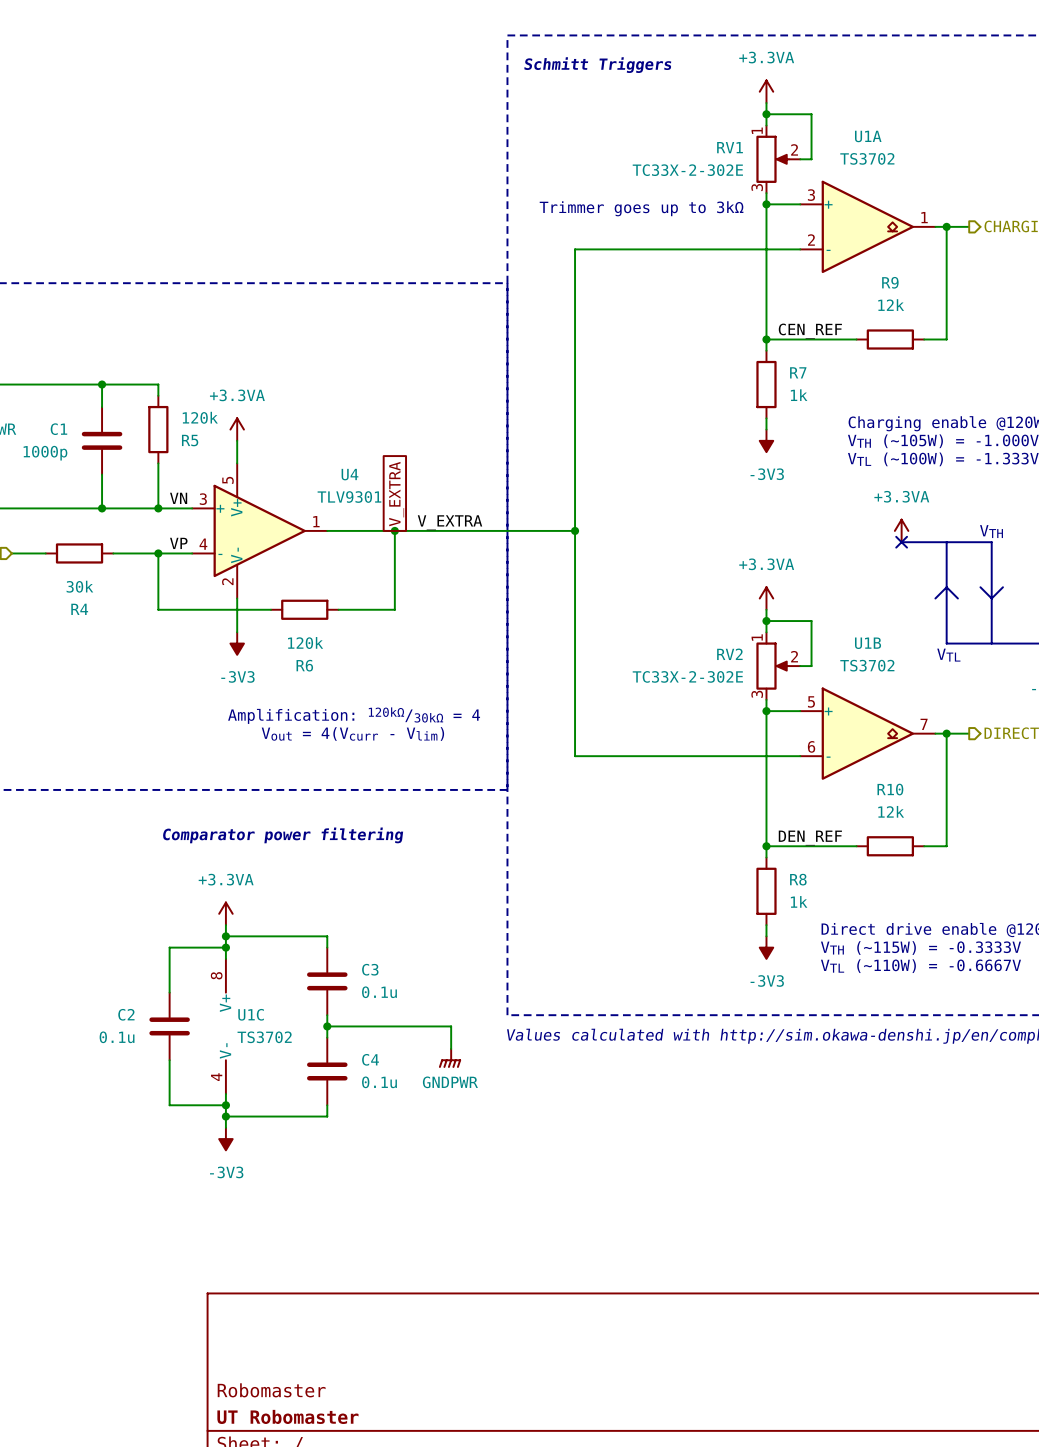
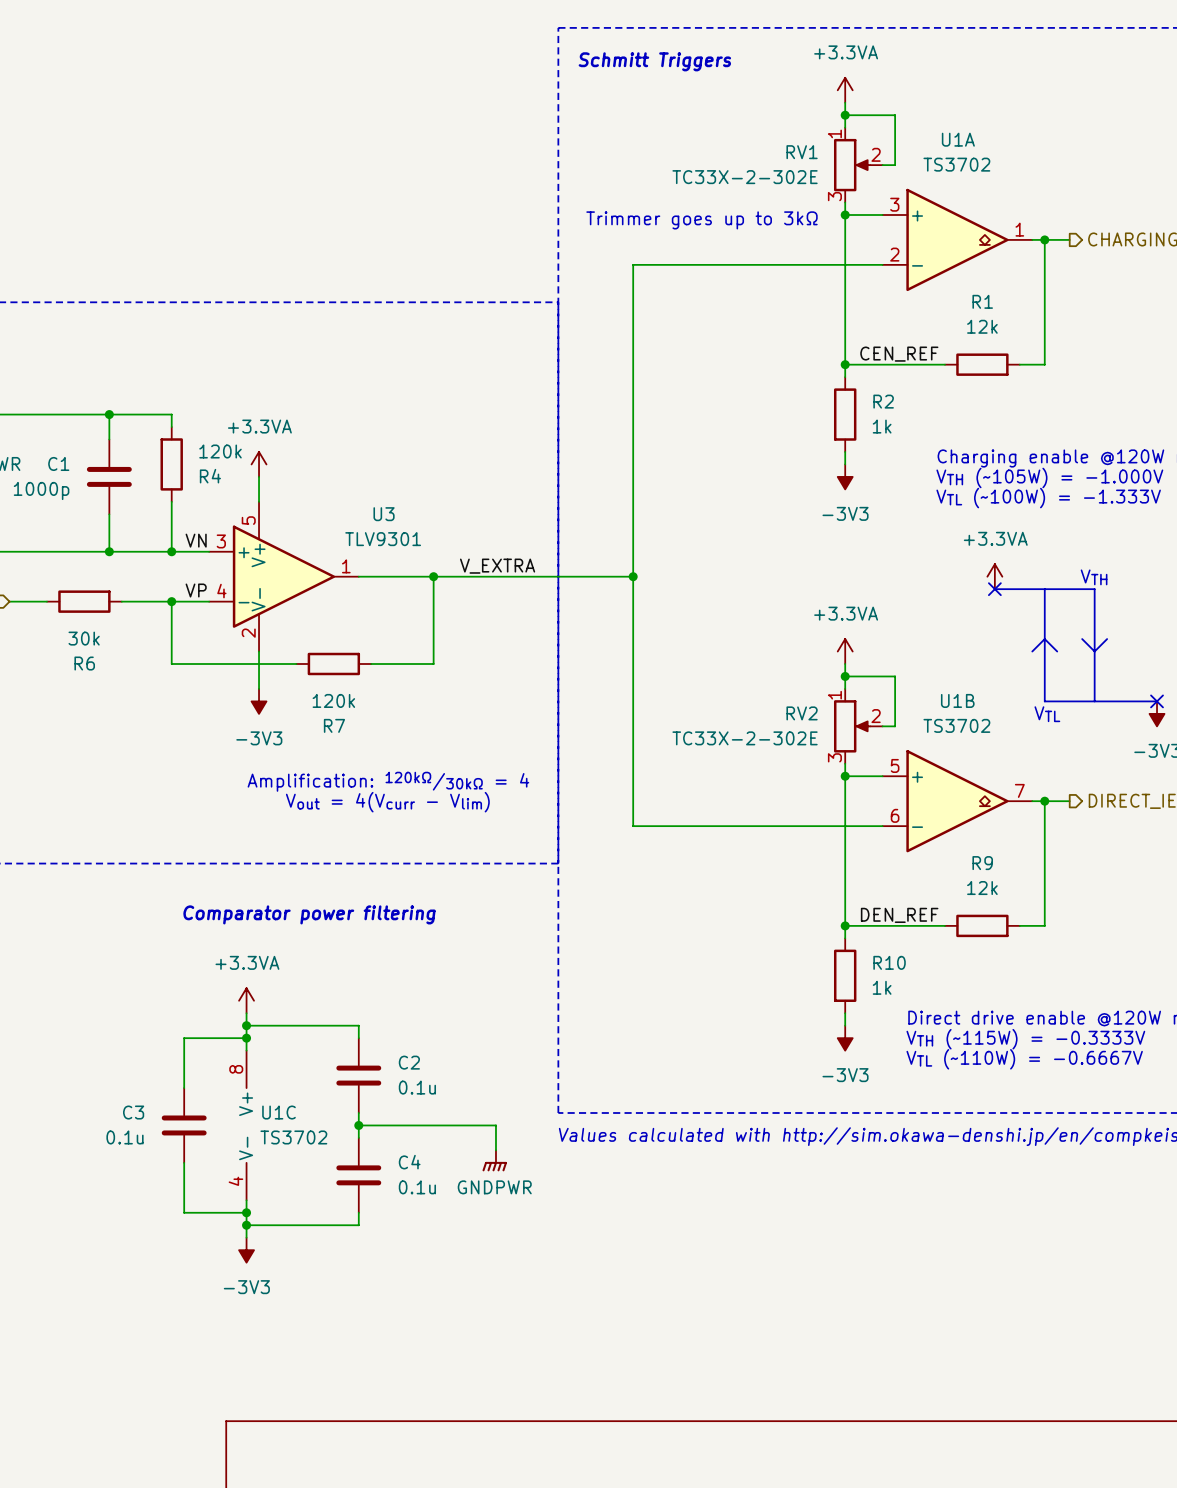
R9 name: R9 (890, 282) -> R1 (982, 301)
R7 name: R7 (798, 372) -> R2 (883, 401)
R5 name: R5 (190, 440) -> R4 (210, 476)
U4 name: U4 (349, 474) -> U3 (384, 514)
global label: V_EXTRA (396, 494) -> none
R4 name: R4 (79, 609) -> R6 (84, 663)
R6 name: R6 (304, 665) -> R7 (334, 725)
R10 name: R10 (890, 789) -> R9 (982, 863)
R8 name: R8 (798, 879) -> R10 (889, 962)
C3 name: C3 (370, 969) -> C2 (409, 1062)
C2 name: C2 (126, 1014) -> C3 (133, 1112)

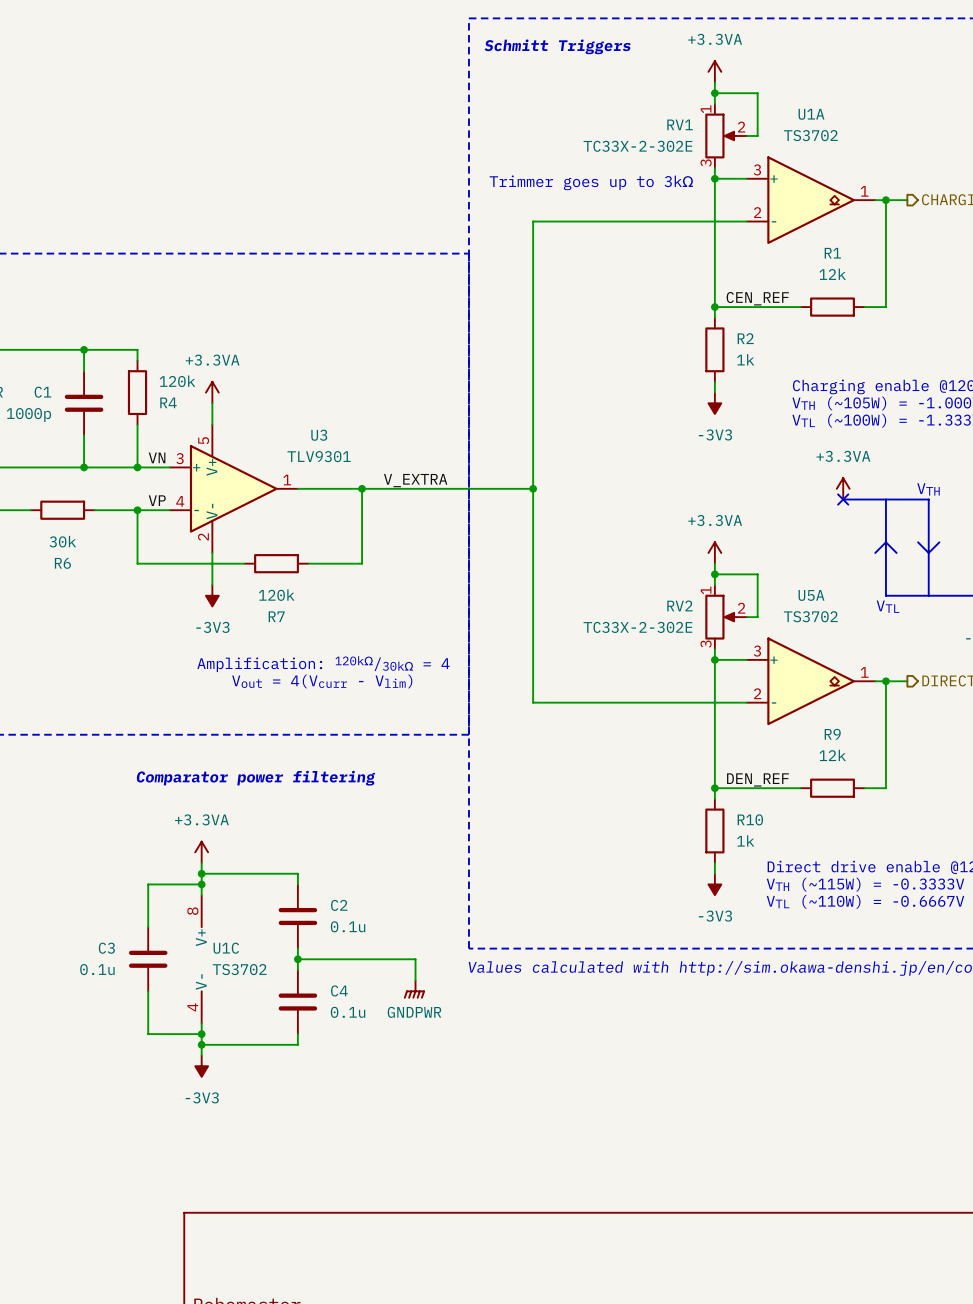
U1B name: U1B (957, 700) -> U5A (811, 595)
U1B pin number: 5 (895, 765) -> 3 (757, 651)
U1B pin number: 7 (1019, 790) -> 1 (864, 672)
U1B pin number: 6 (895, 815) -> 2 (757, 693)

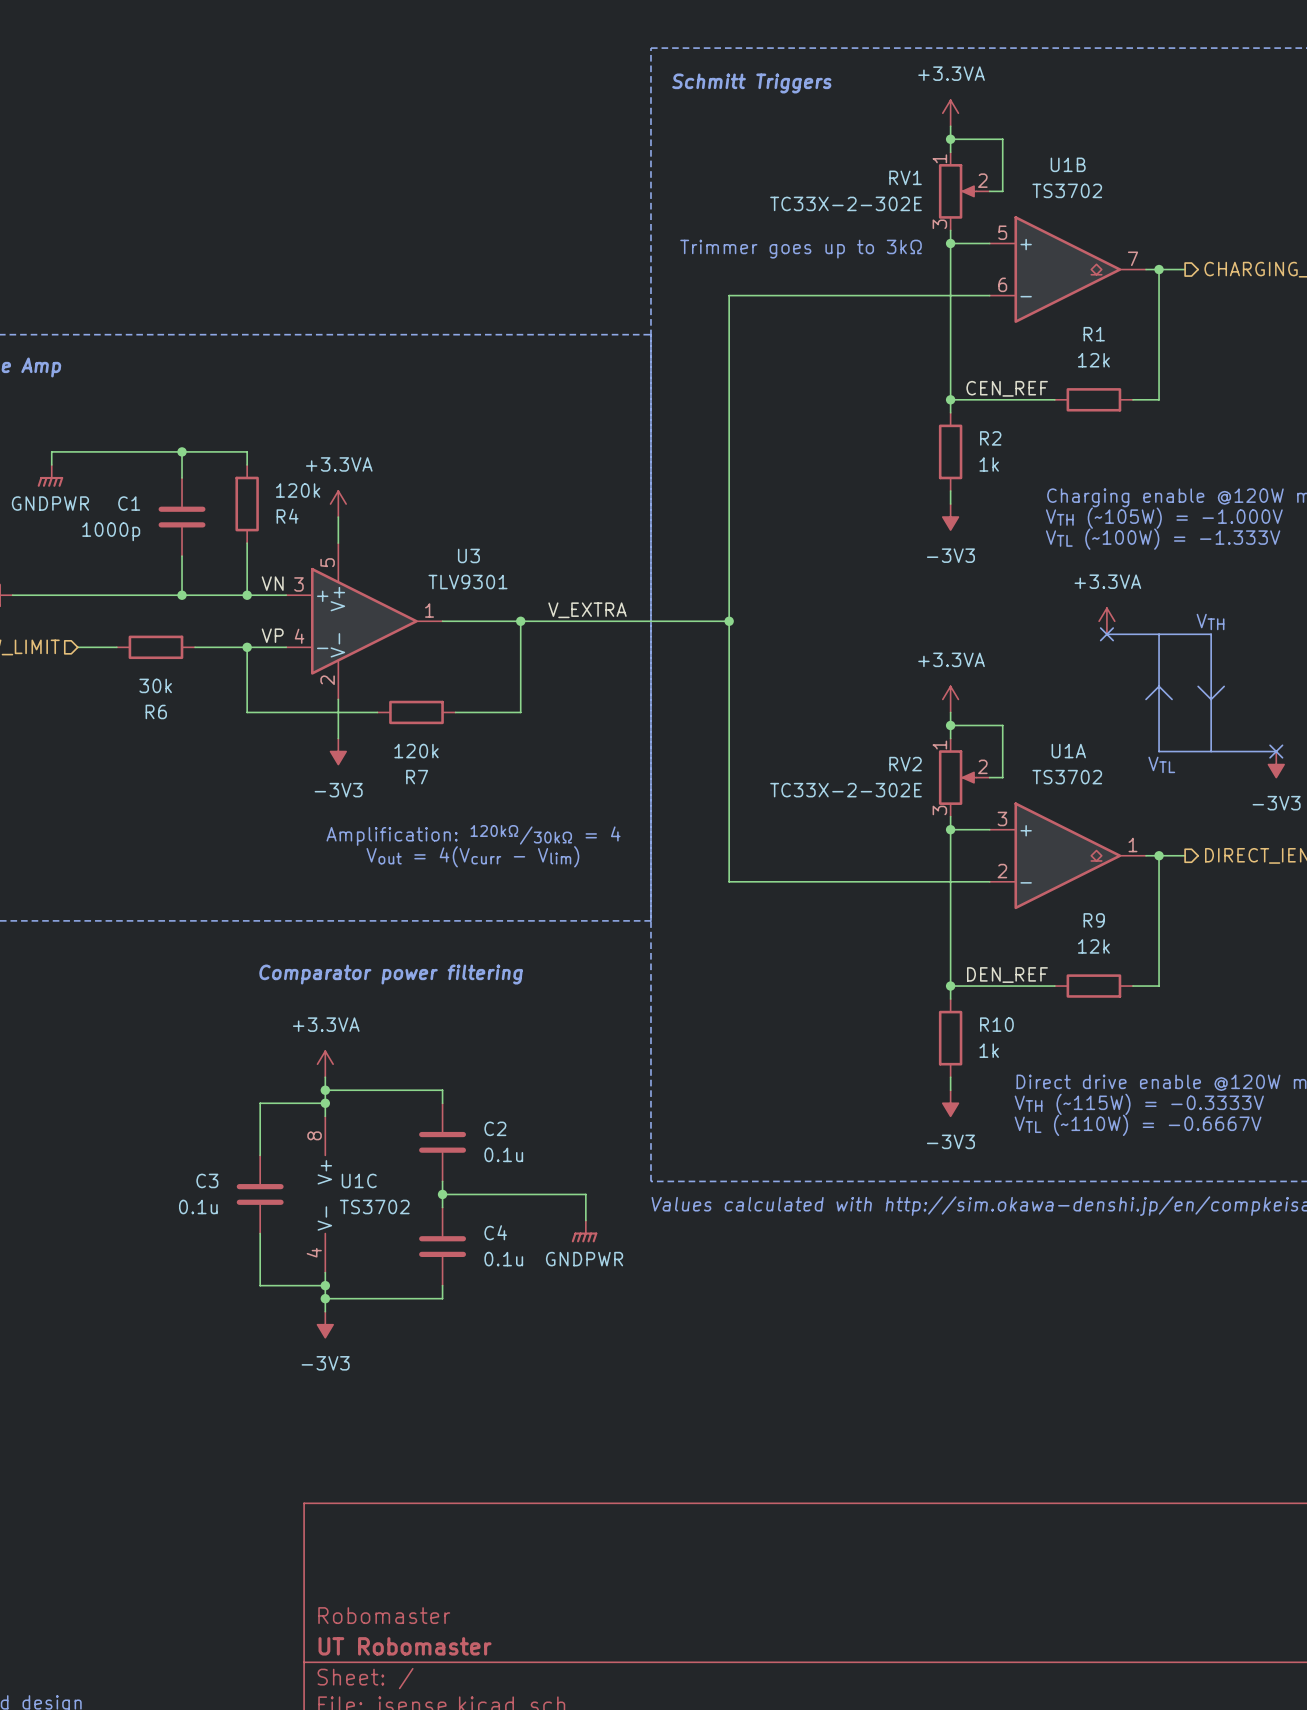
U1A name: U1A (811, 114) -> U1B (1068, 164)
U1A pin number: 3 (757, 169) -> 5 (1002, 232)
U1A pin number: 1 (864, 191) -> 7 (1132, 258)
U1A pin number: 2 (757, 212) -> 6 (1002, 284)
U5A name: U5A (811, 595) -> U1A (1068, 751)

